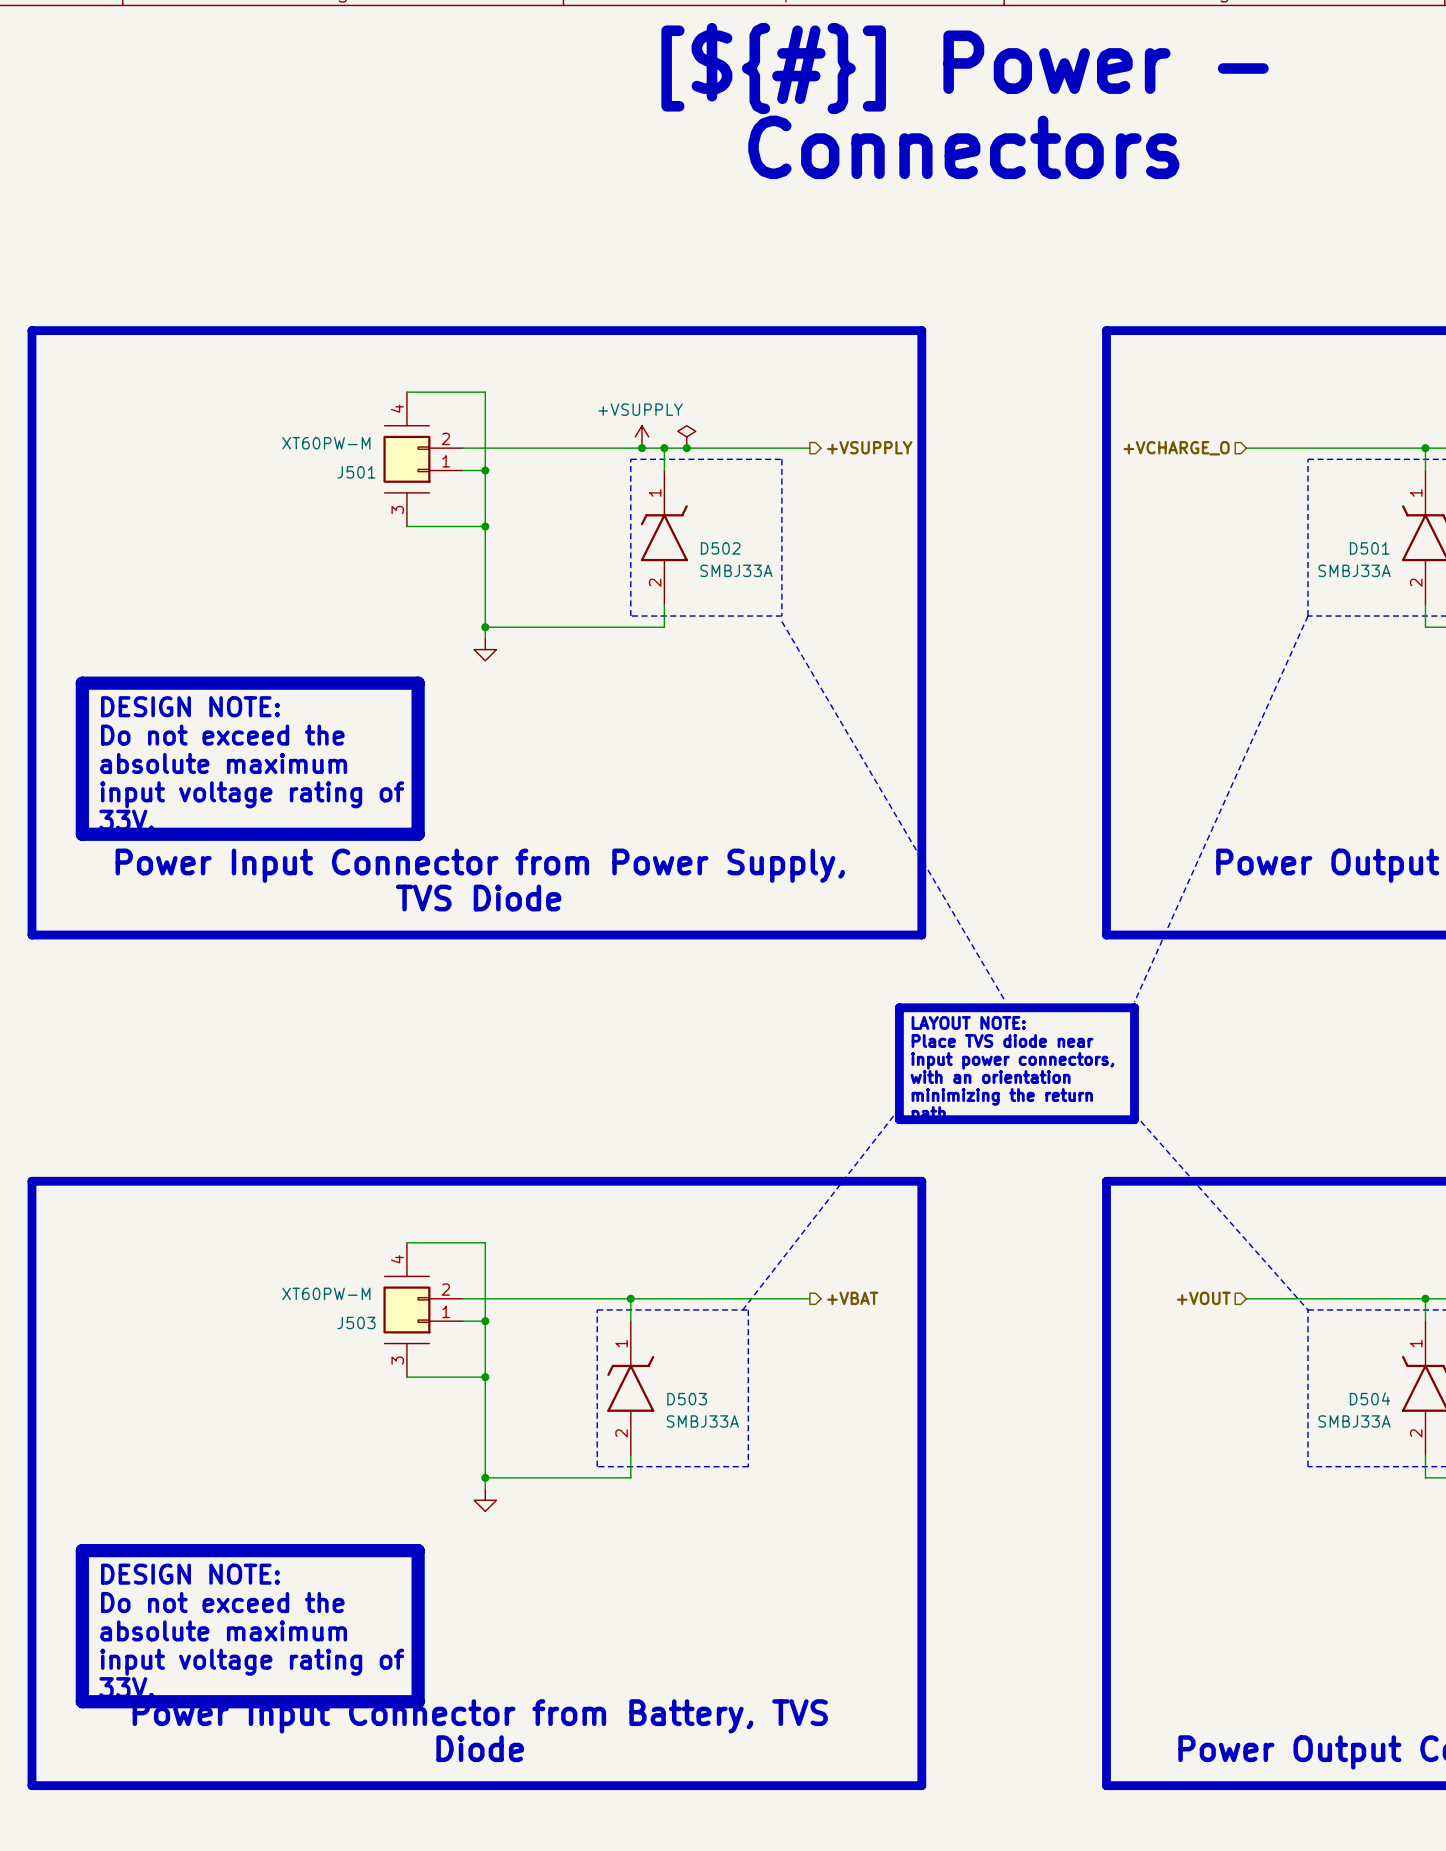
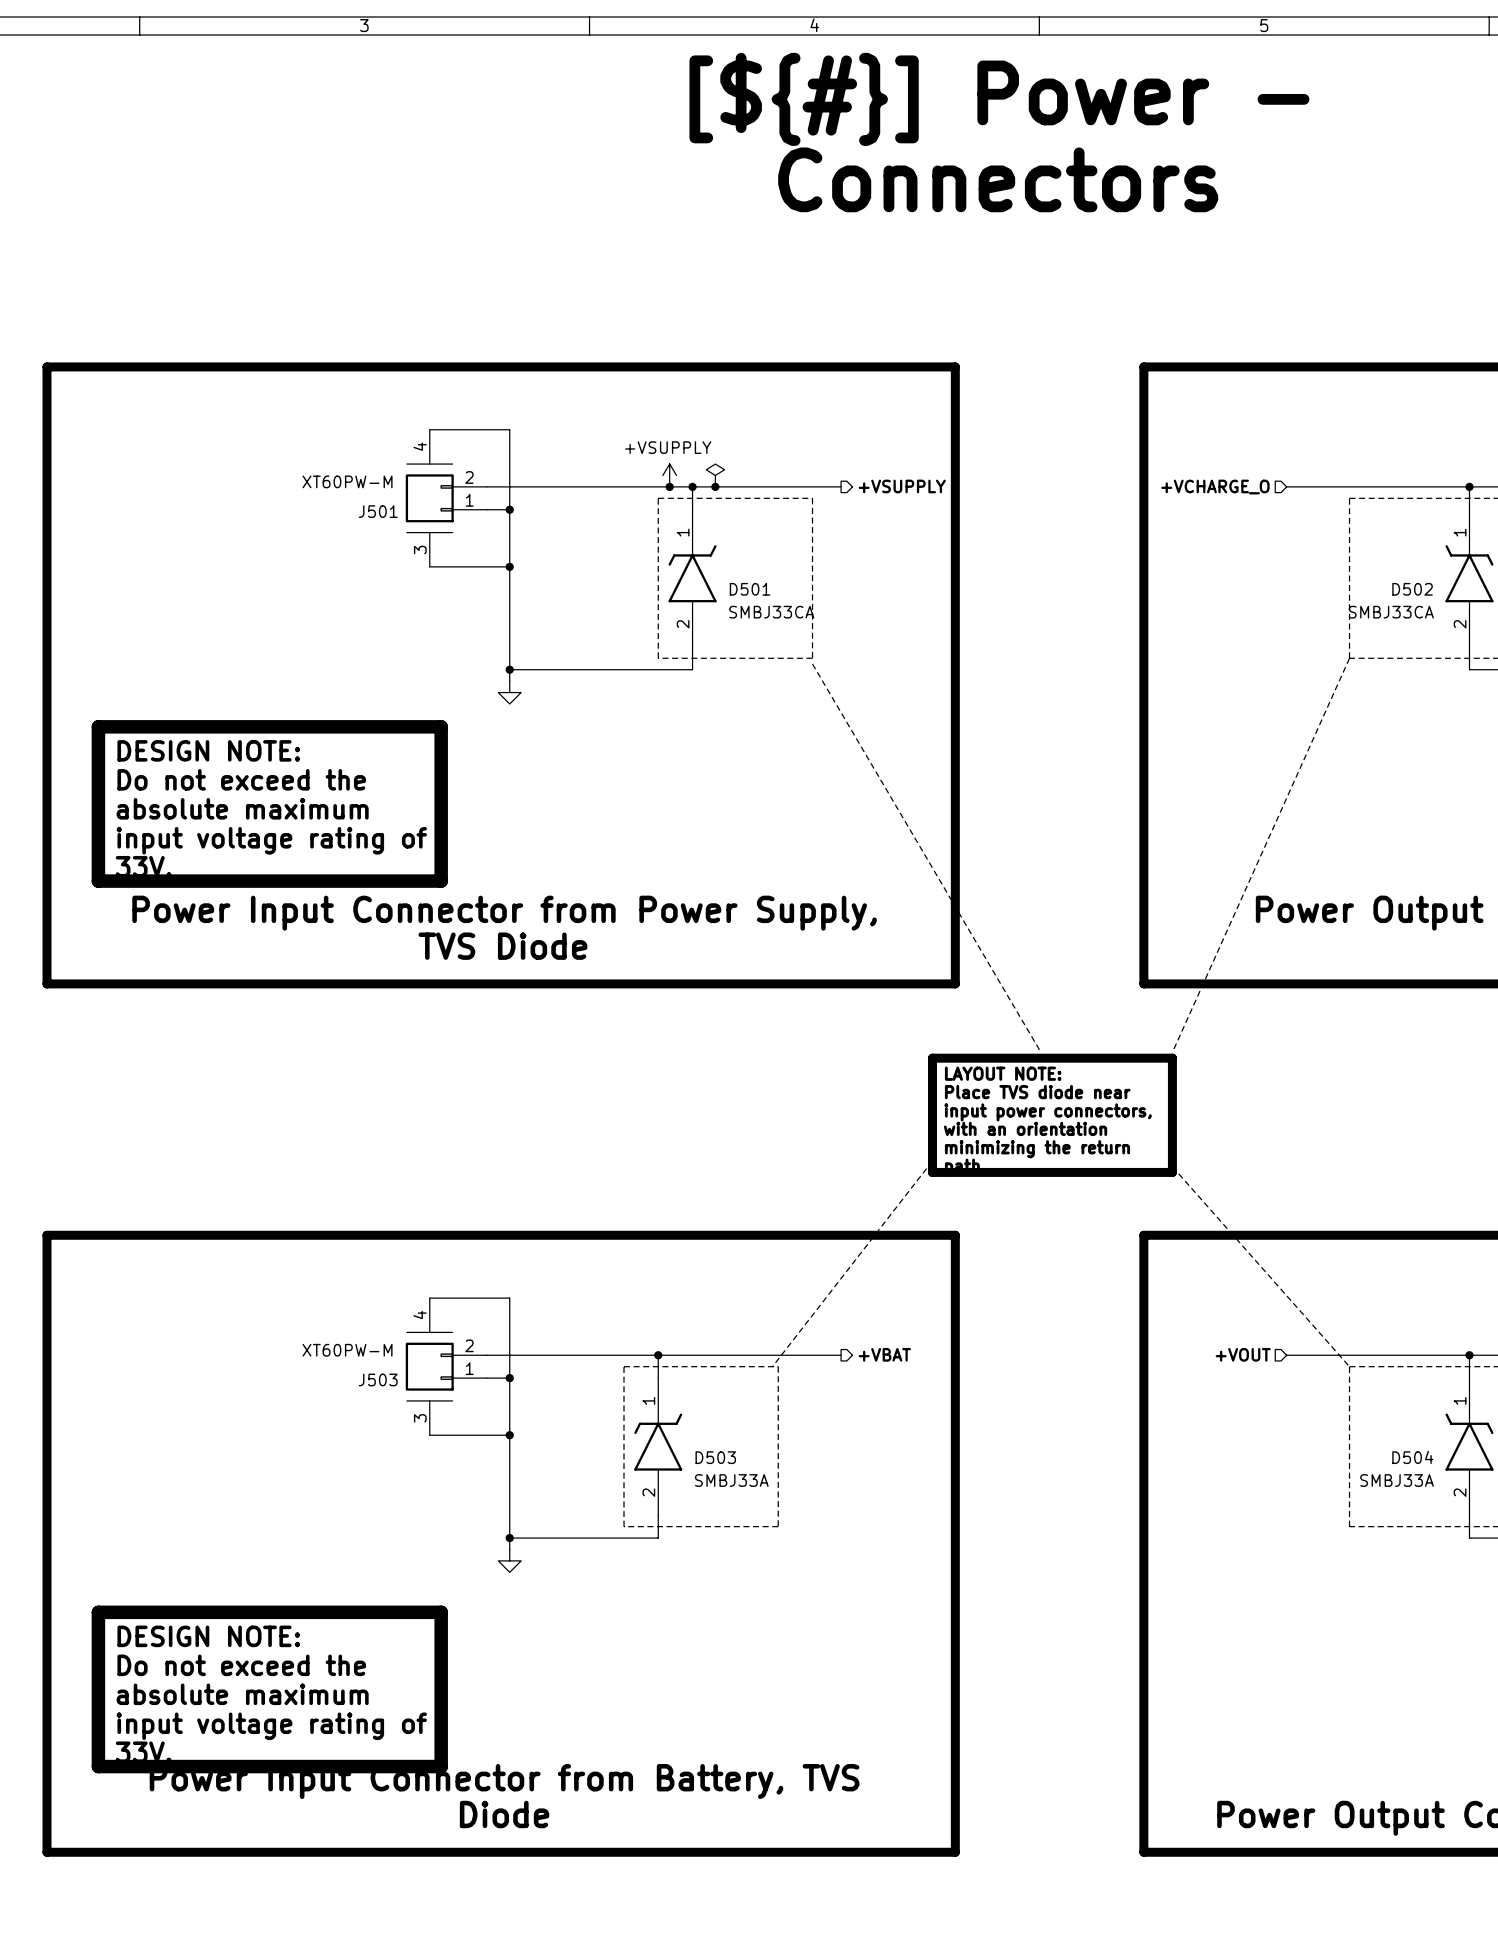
D502 name: D502 (720, 548) -> D501 (750, 589)
D501 name: D501 (1369, 548) -> D502 (1412, 589)
D502 value: SMBJ33A (736, 570) -> SMBJ33CA (771, 612)
D501 value: SMBJ33A (1354, 570) -> SMBJ33CA (1391, 612)

